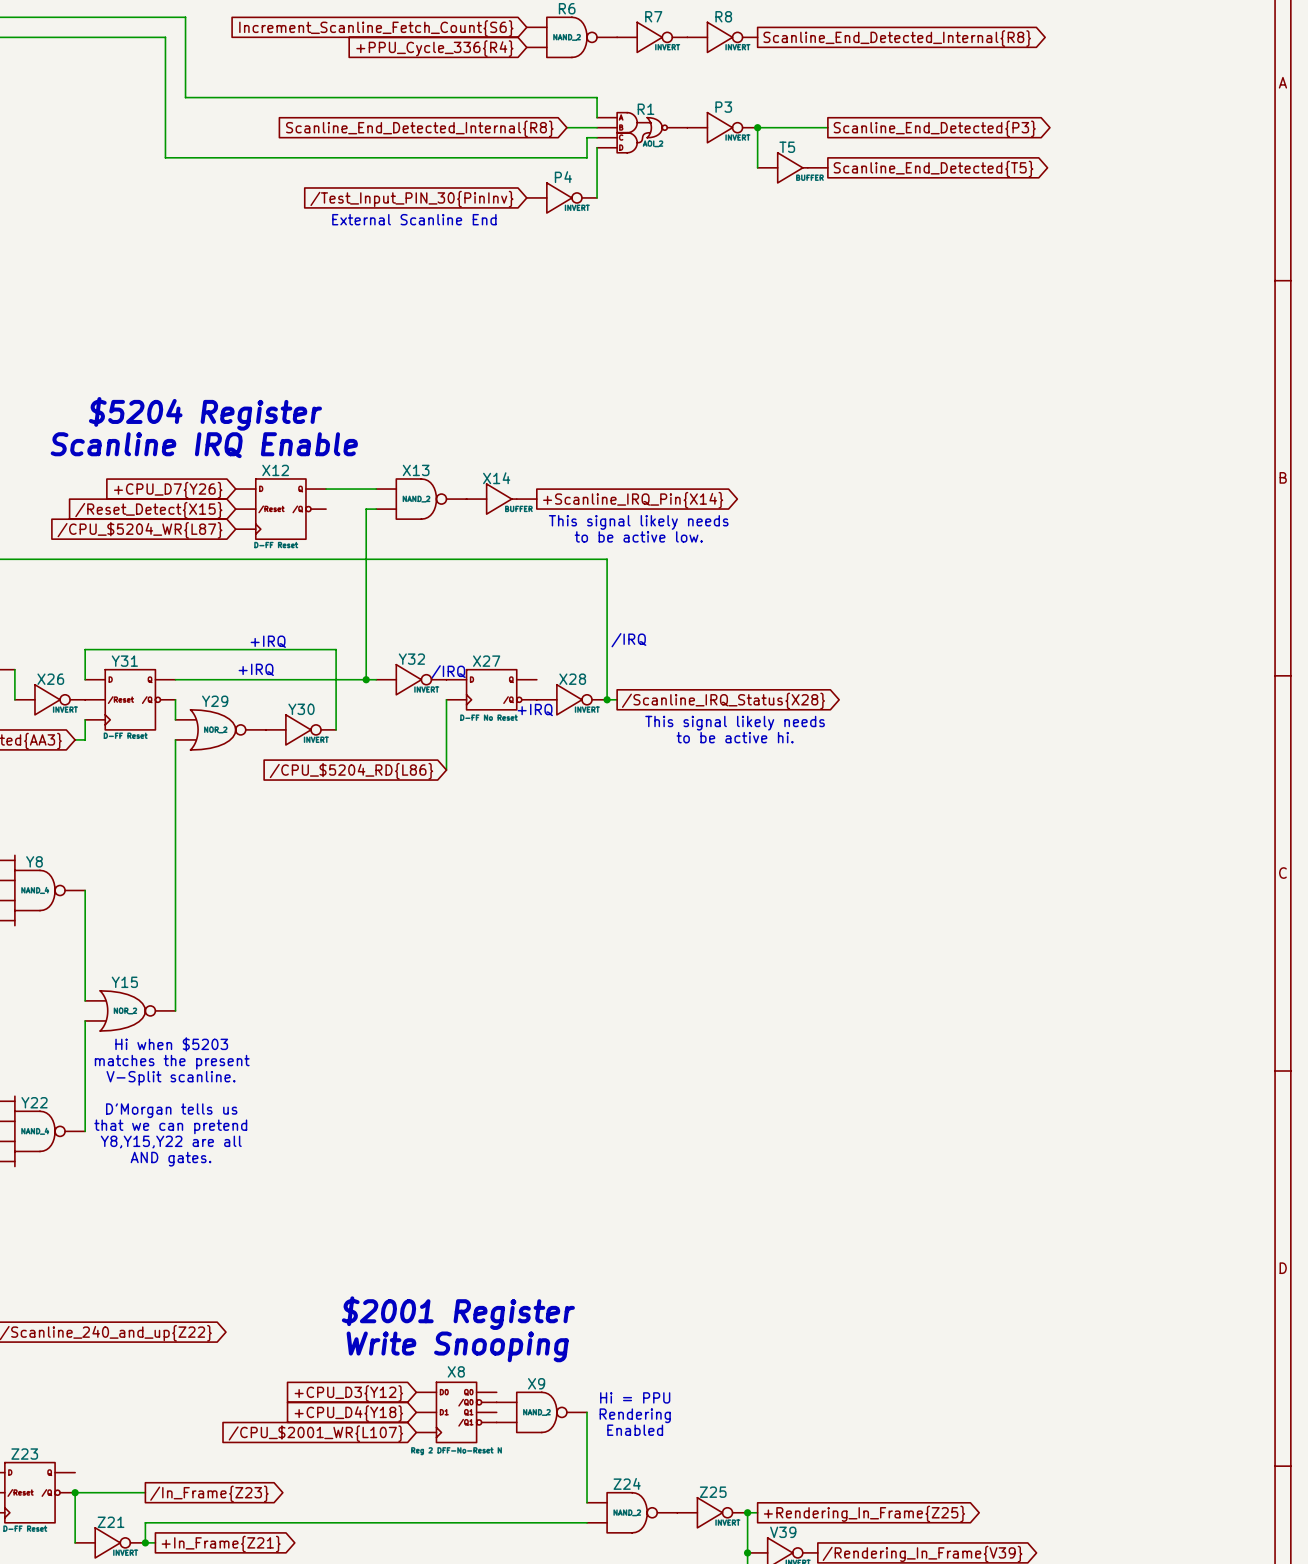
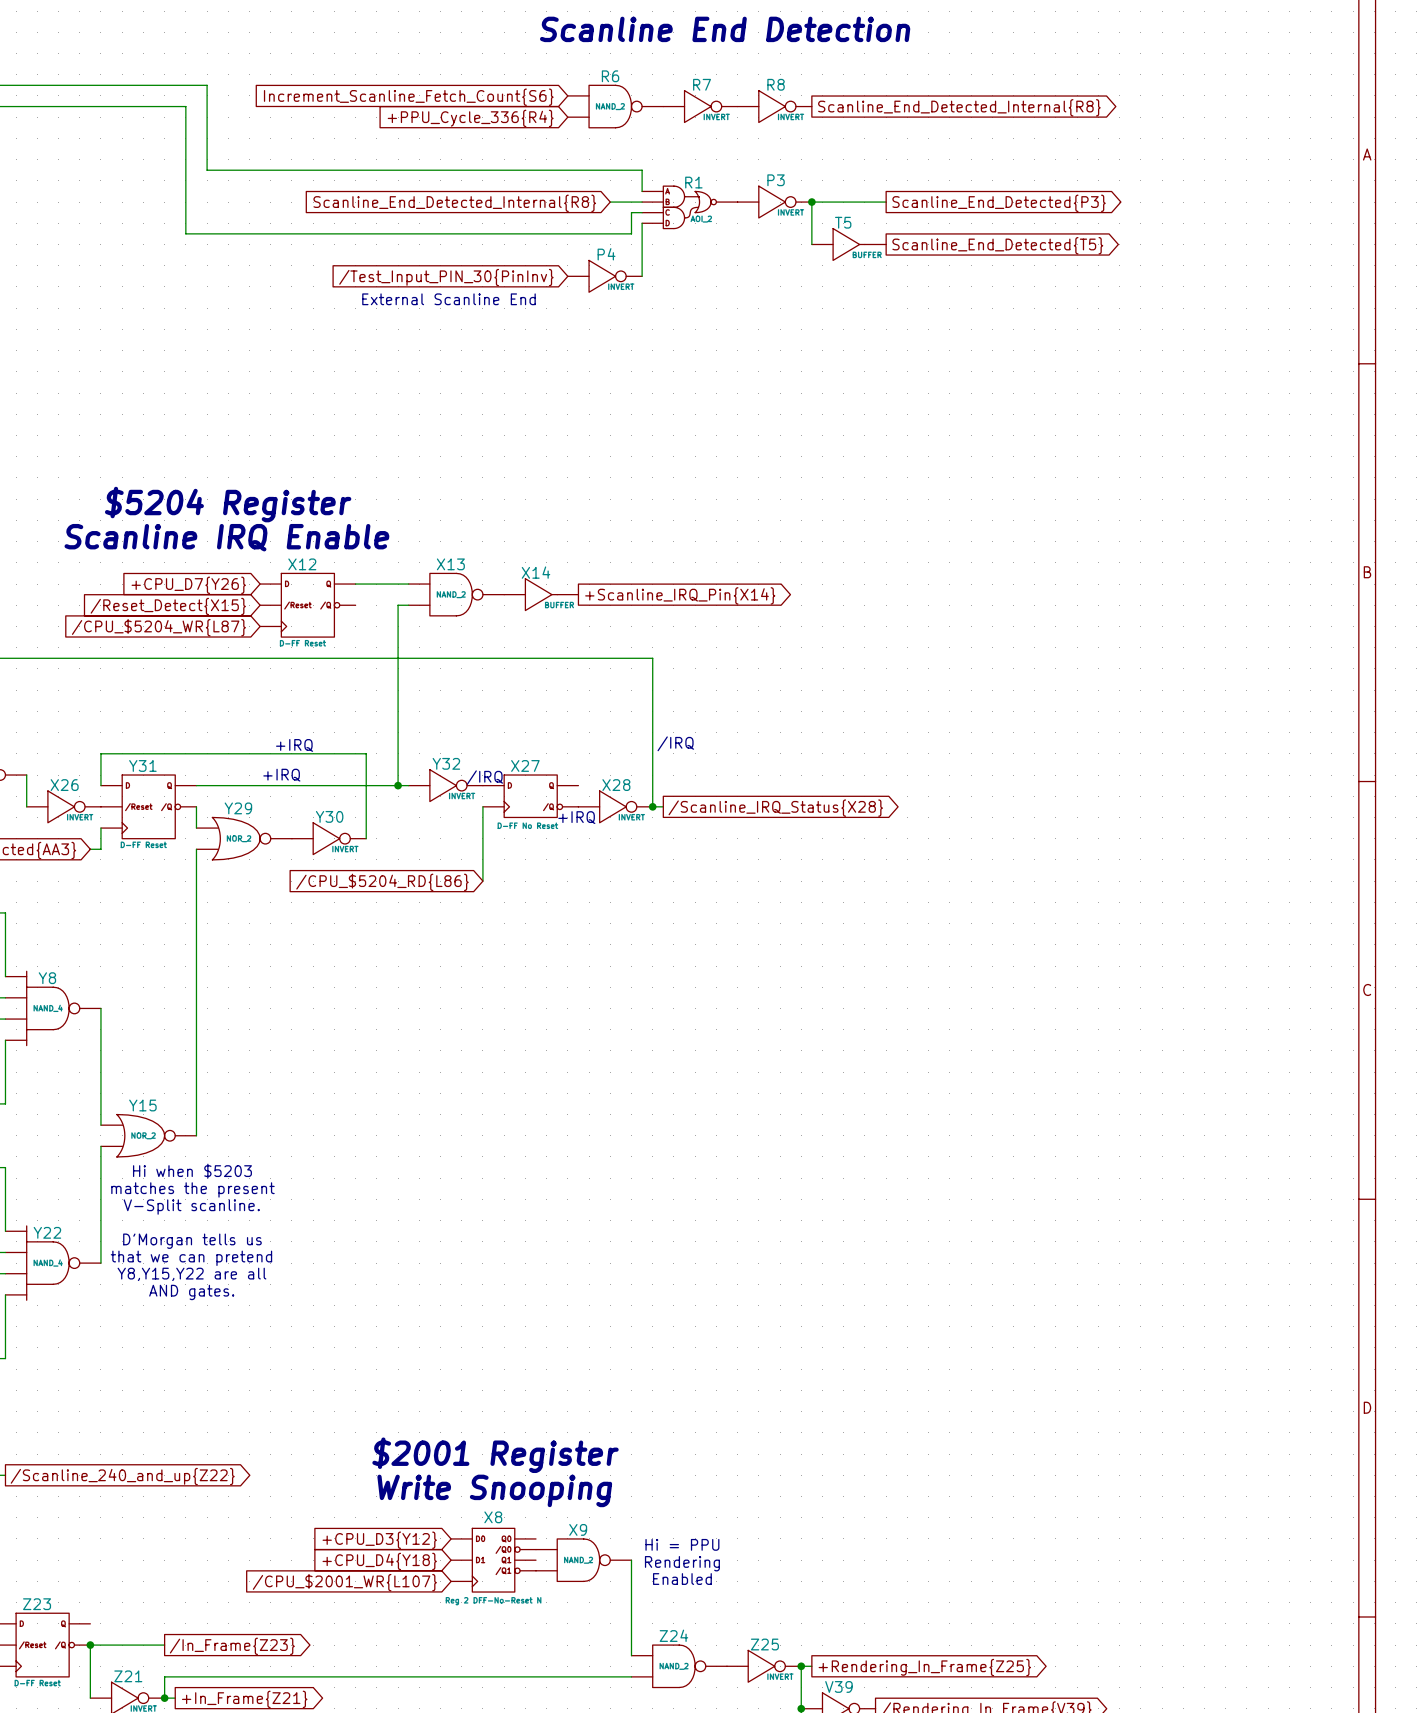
text: This signal likely needs (638, 522) -> none
text: to be active low. (638, 536) -> none
text: This signal likely needs (735, 723) -> none
text: to be active hi. (735, 737) -> none

